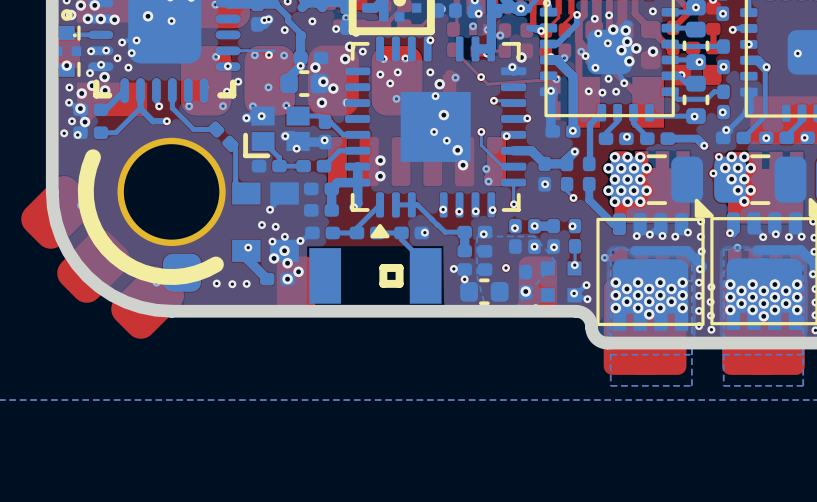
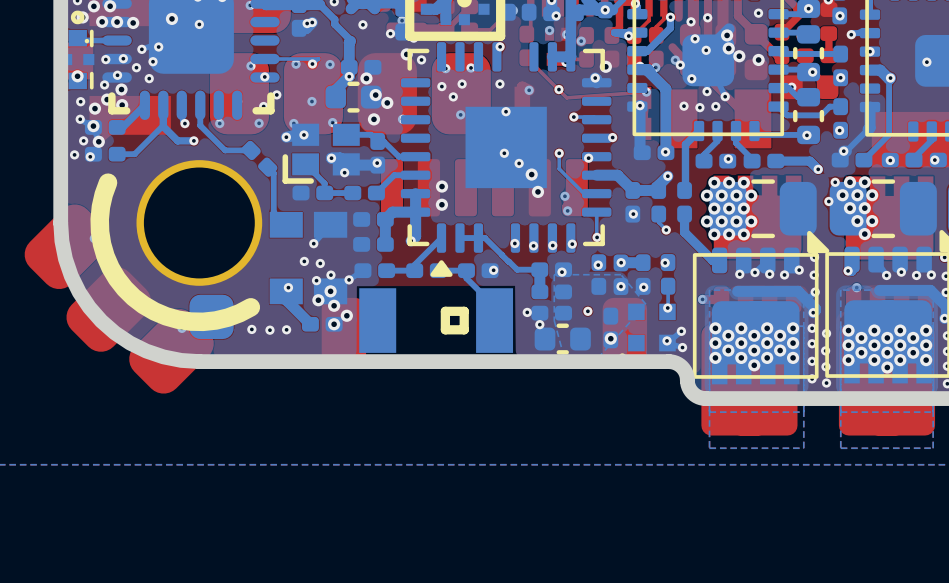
top track: (584, 15) (578, 20) (578, 96) -> none
via: (613, 29) -> none
via: (284, 30) -> none
via: (621, 50) -> none
via: (345, 59) -> none
via: (629, 61) -> none
via: (439, 84) -> none
via: (443, 115) -> none

